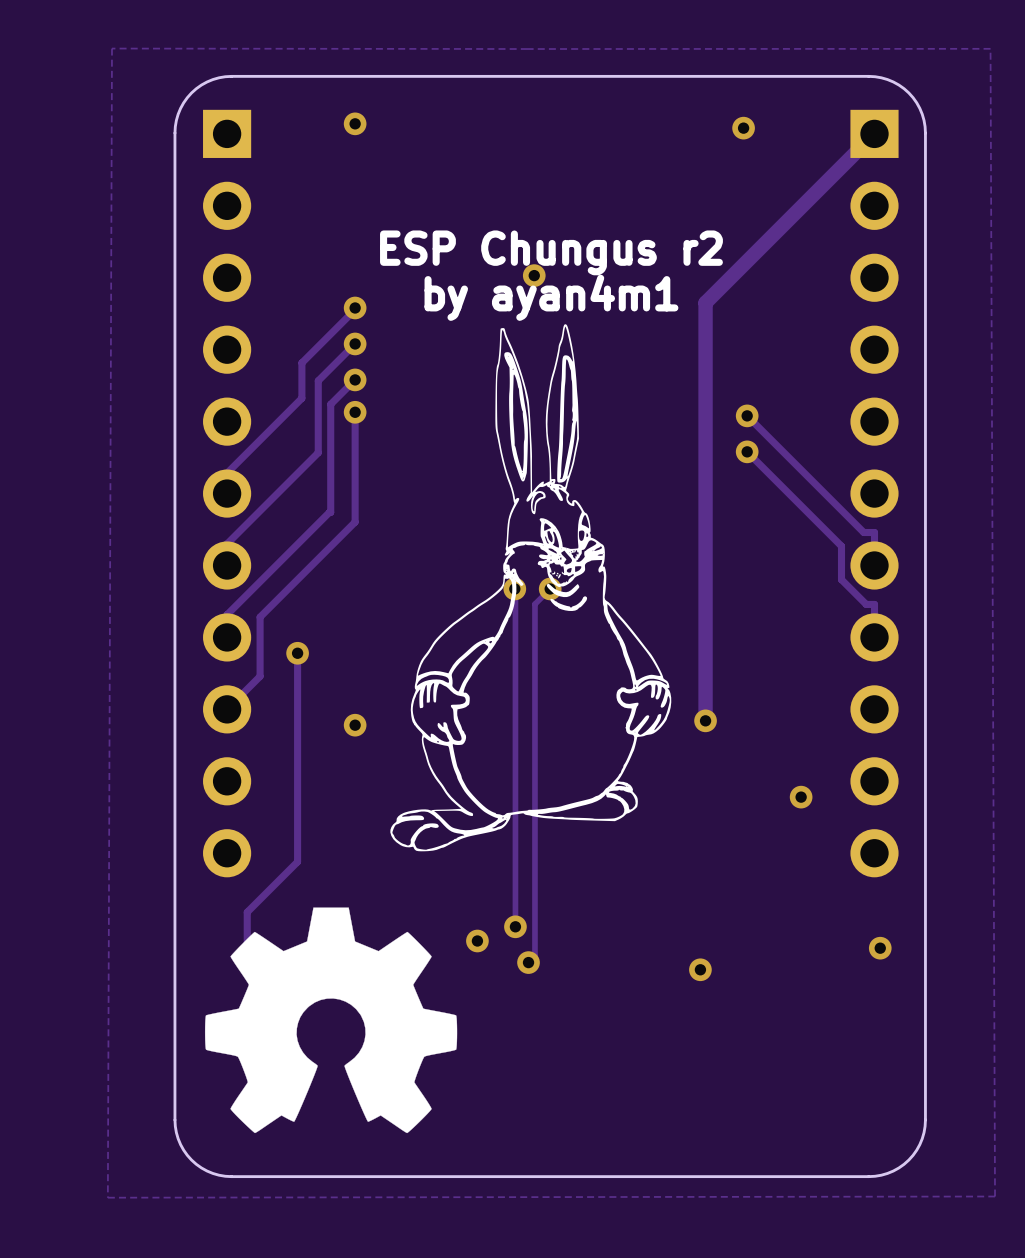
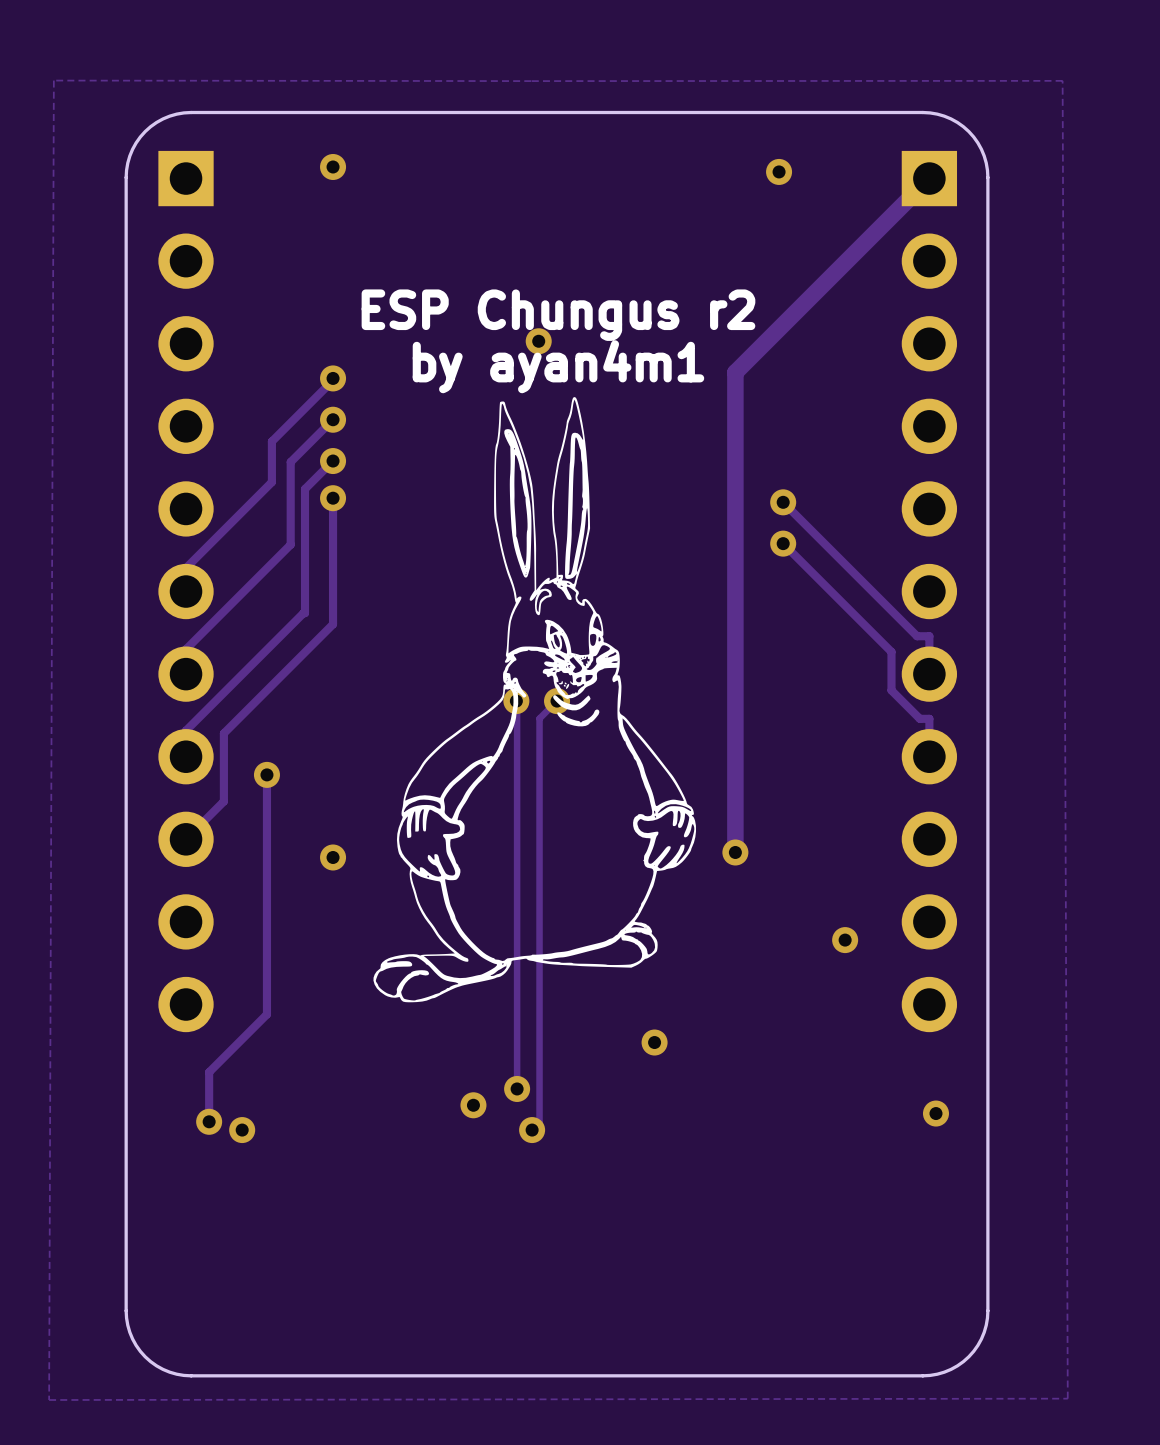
drawing: [204, 907, 458, 1134] -> none
via position: (700, 969) -> (654, 1042)

